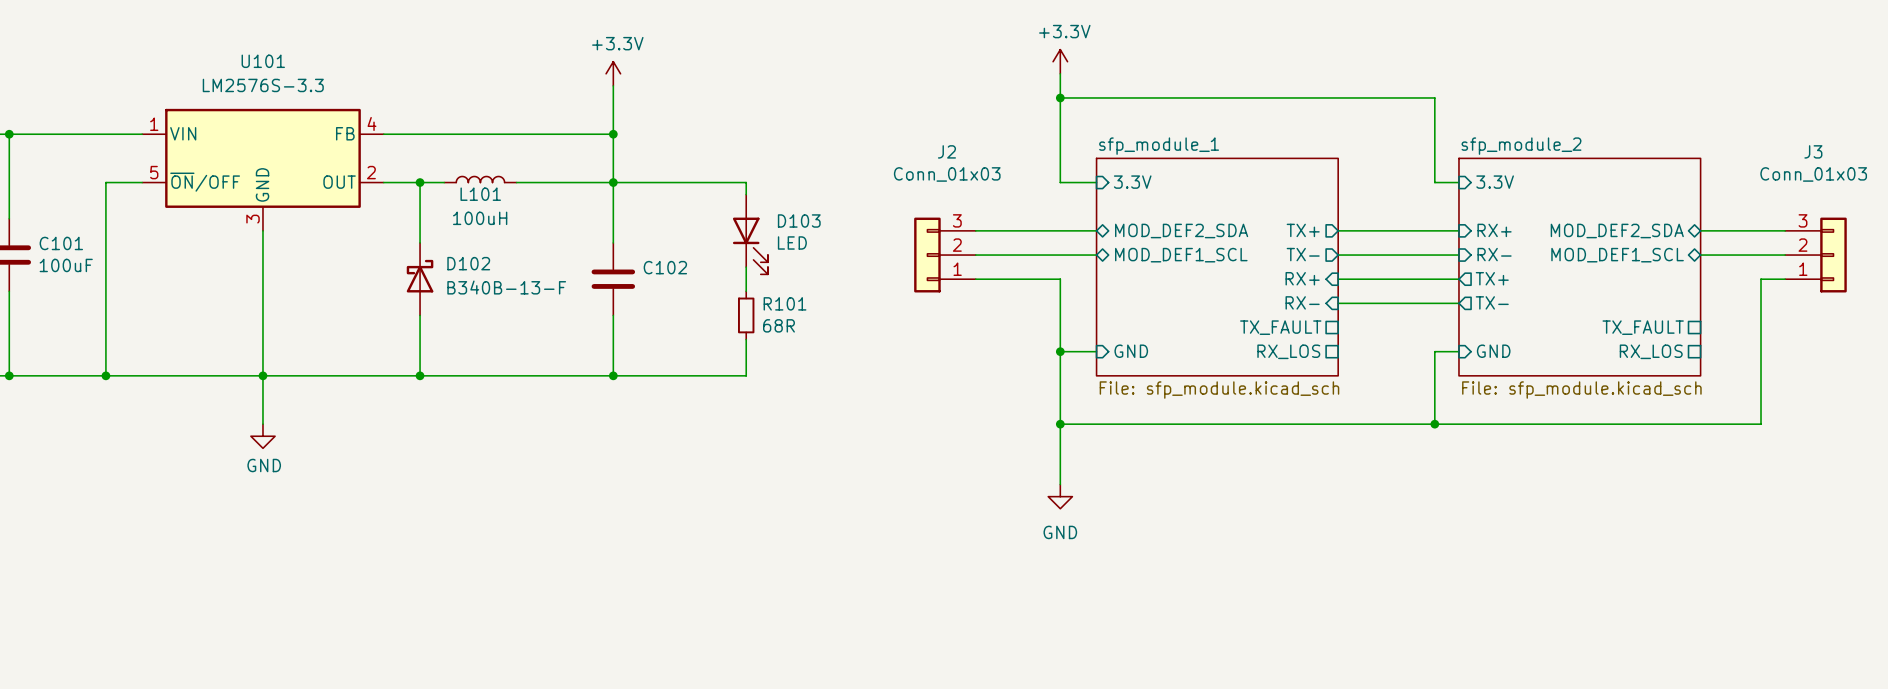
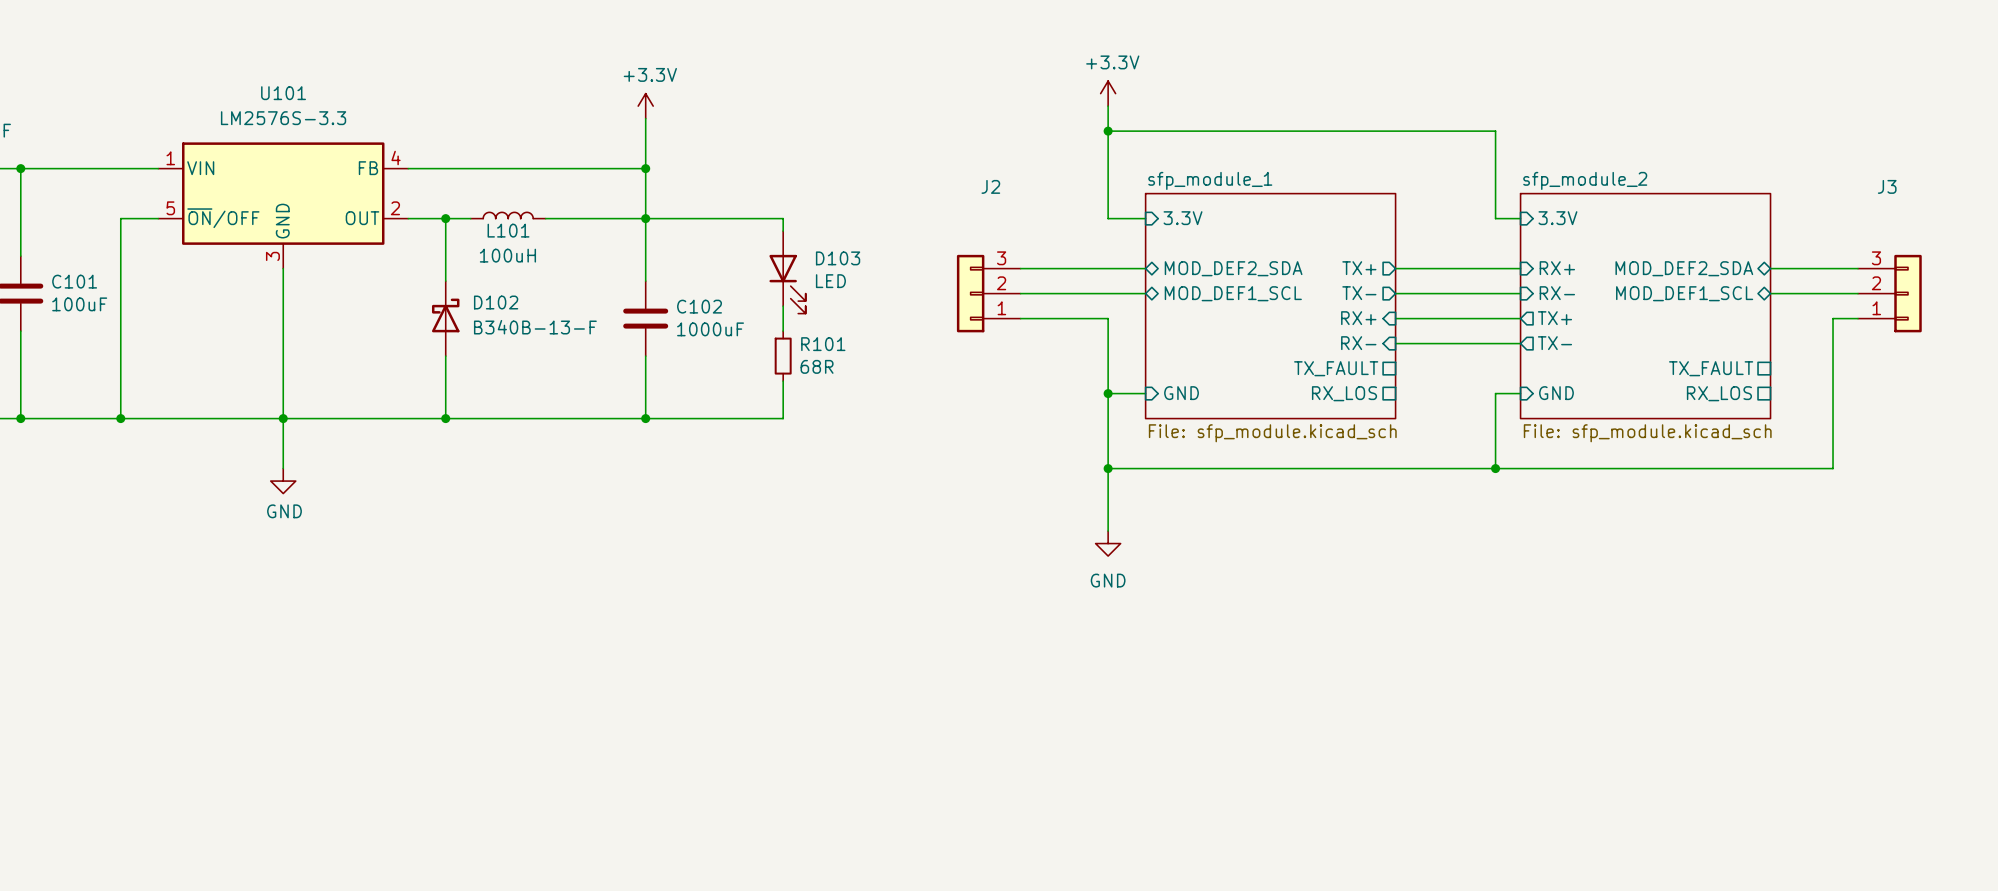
J2 value: Conn_01x03 (947, 174) -> none
J3 value: Conn_01x03 (1813, 174) -> none
C102 value: none -> 1000uF (710, 329)

